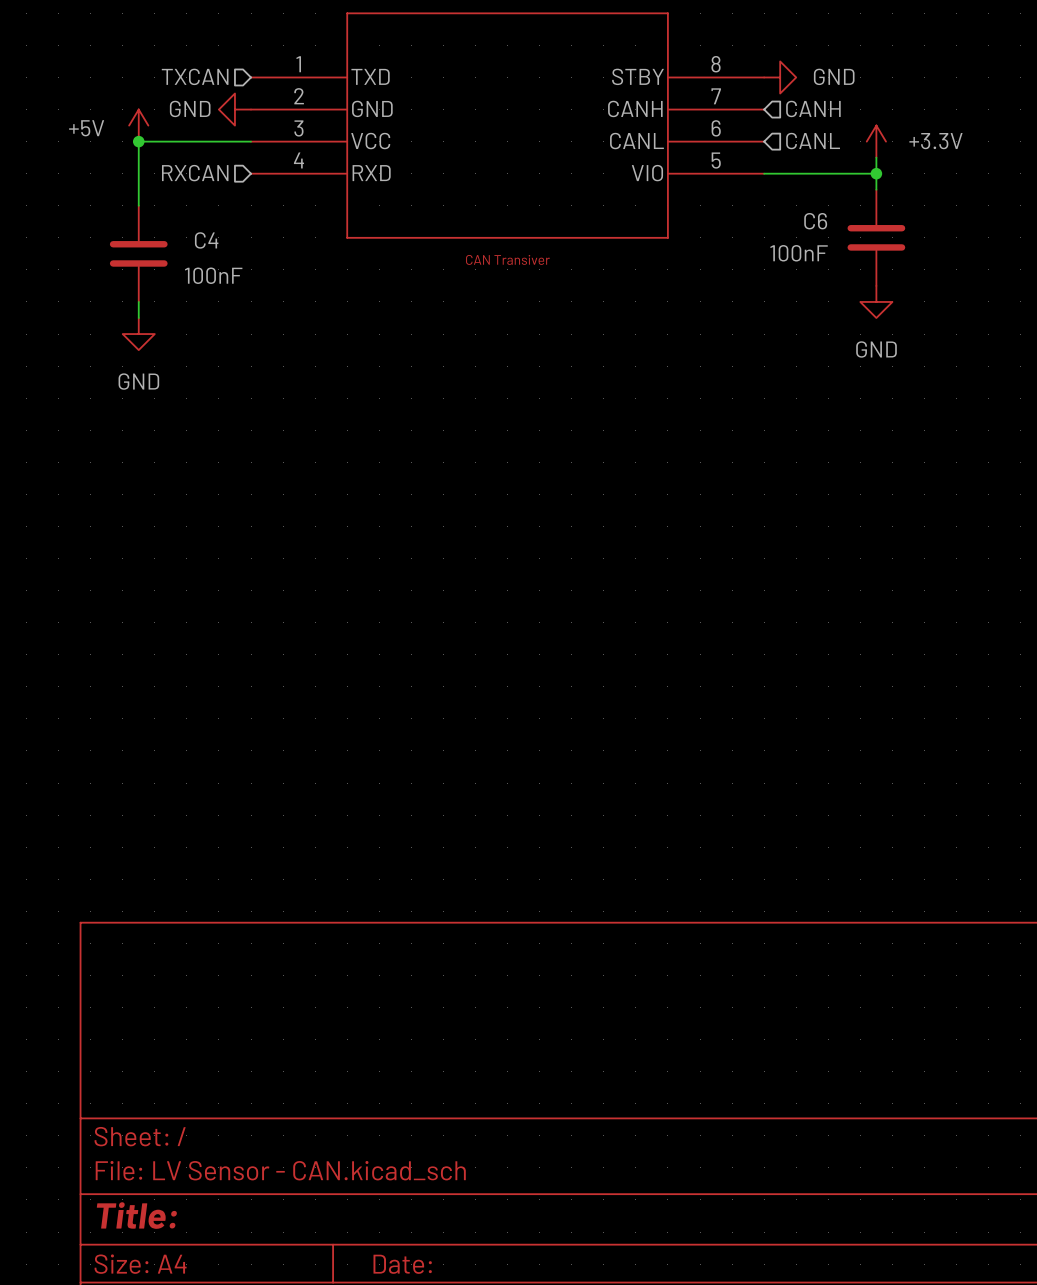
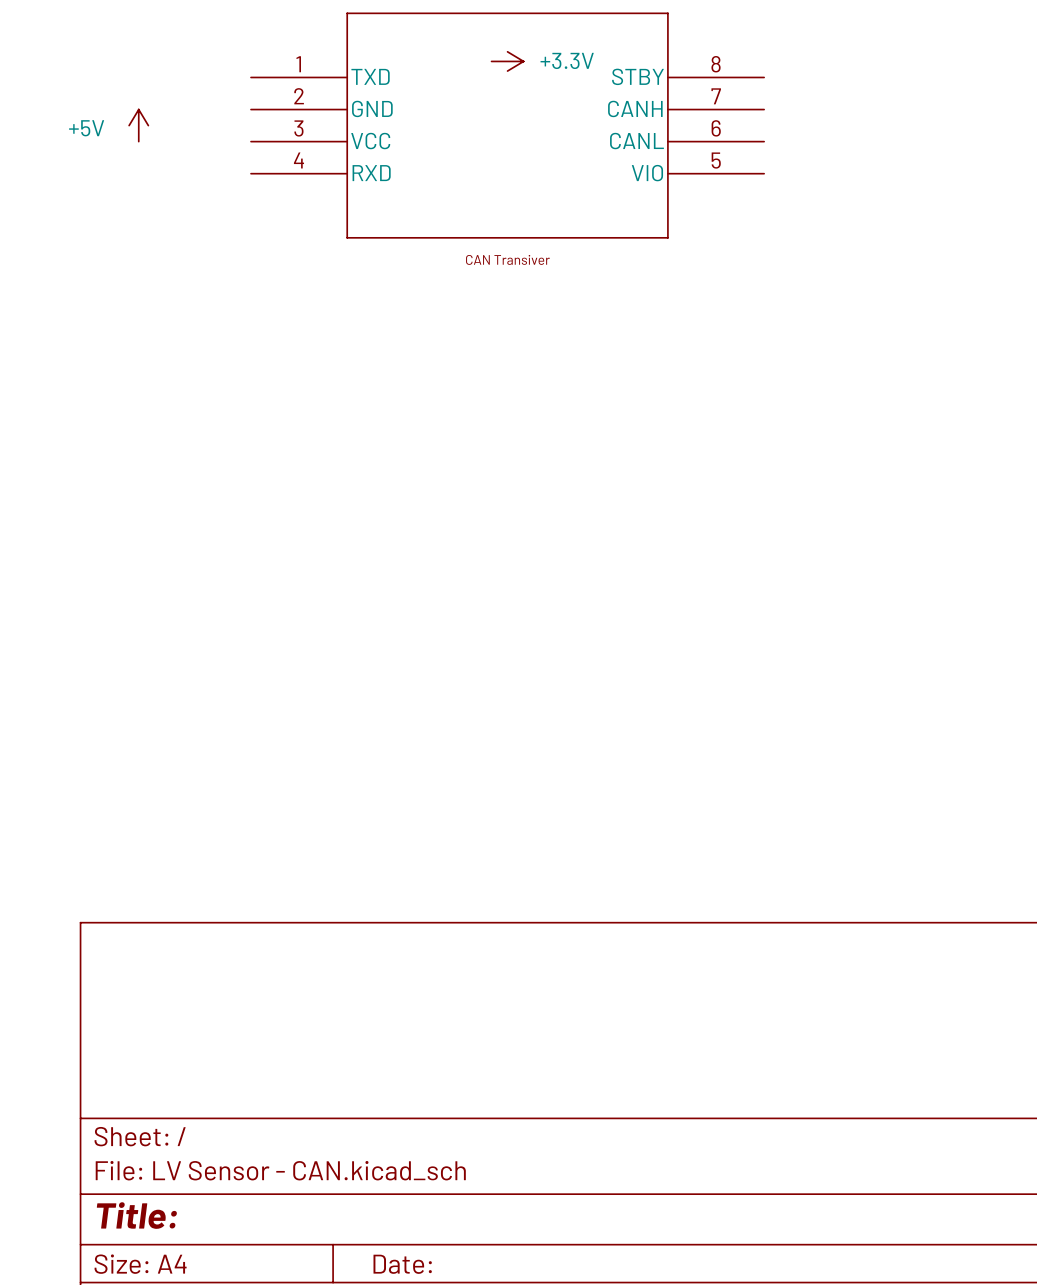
power symbol: none -> +3.3V (507, 61)
hierarchical label: TXCAN (195, 76) -> none
power symbol: GND (780, 77) -> none
hierarchical label: CANH (813, 108) -> none
power symbol: GND (234, 109) -> none
junction: (138, 141) -> none
wire: (251, 141) (138, 141) (138, 205) -> none
hierarchical label: CANL (813, 141) -> none
power symbol: +3.3V (876, 141) -> none
wire: (876, 157) (876, 189) -> none
hierarchical label: RXCAN (195, 173) -> none
wire: (764, 173) (876, 173) -> none
junction: (876, 173) -> none
C6: 100nF (876, 237) -> none
C4: 100nF (138, 253) -> none
wire: (138, 301) (138, 318) -> none
power symbol: GND (876, 301) -> none
power symbol: GND (138, 334) -> none

